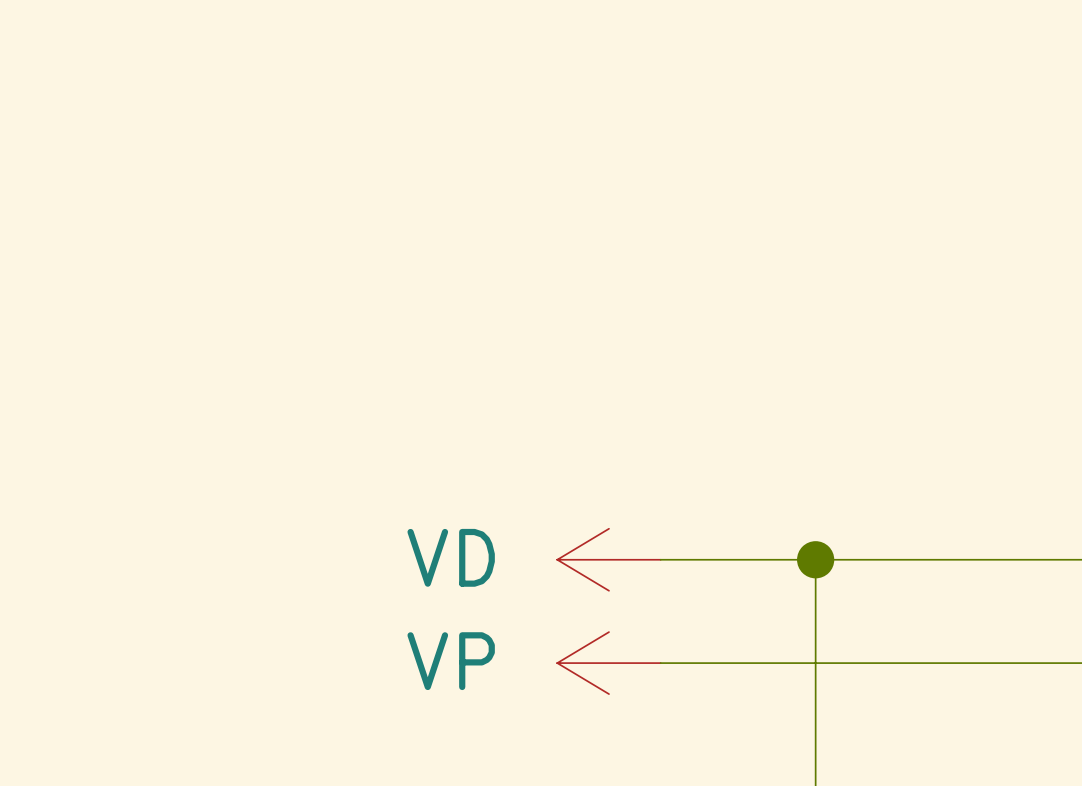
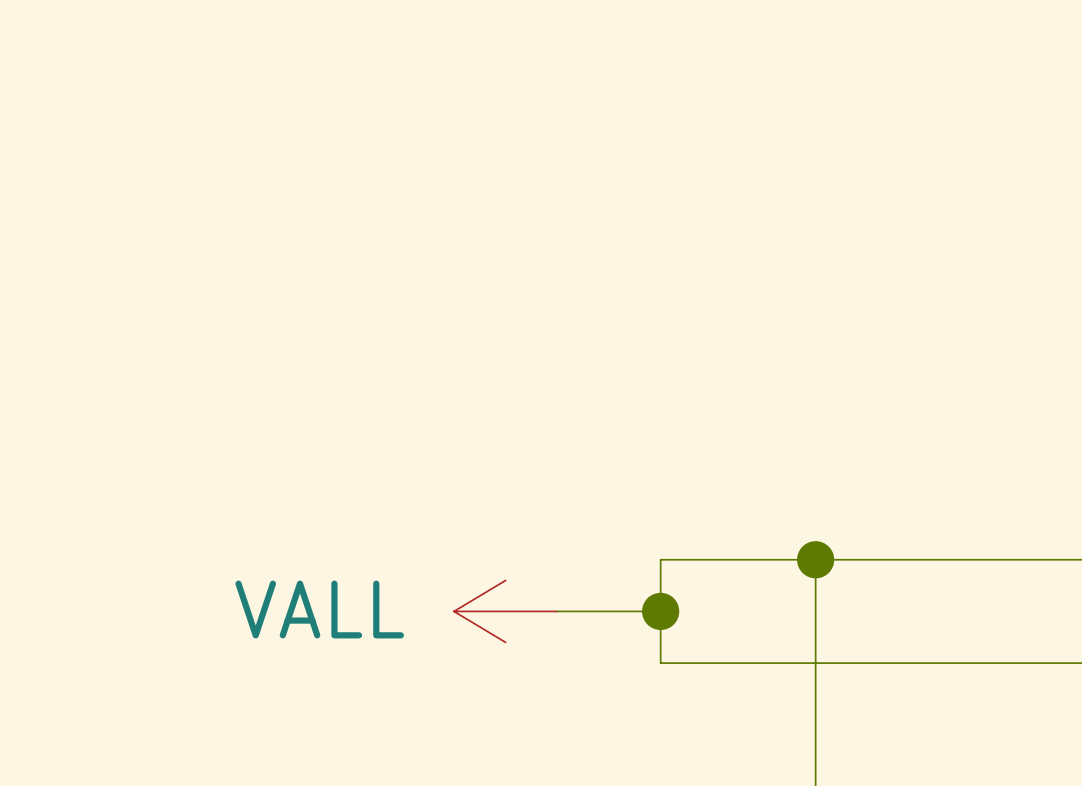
power symbol: VD (608, 559) -> none
wire: none -> (660, 559) (660, 663)
power symbol: none -> VALL (505, 611)
wire: none -> (557, 611) (660, 611)
junction: none -> (660, 611)
power symbol: VP (608, 663) -> none

